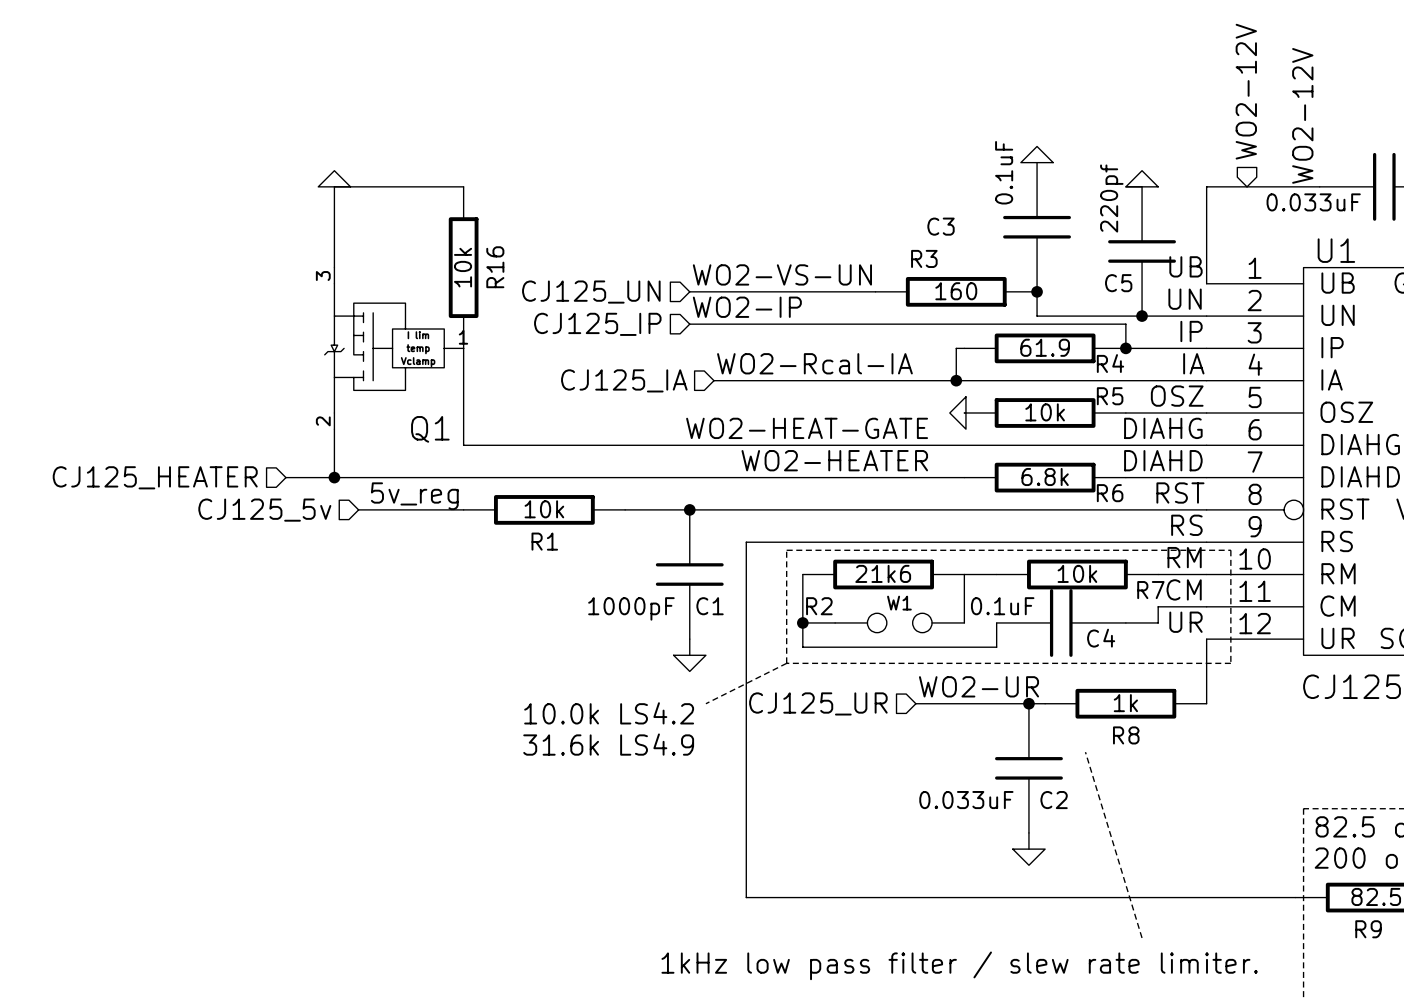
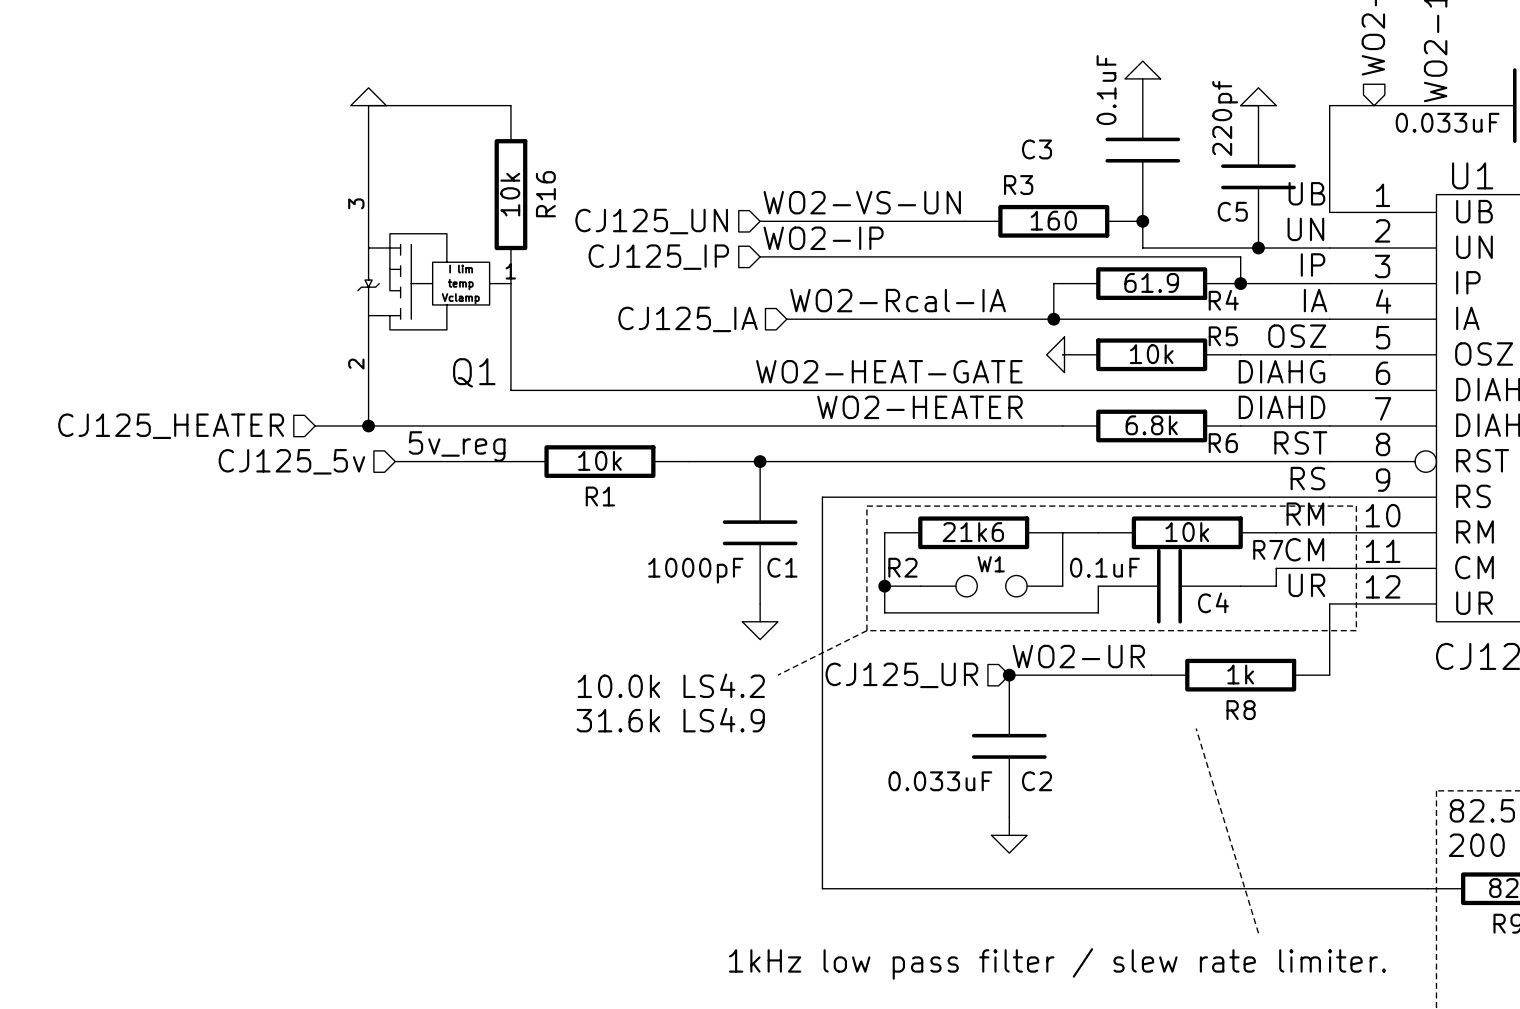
junction: none -> (1009, 675)
junction: (1028, 703) -> none
C2 position: (1028, 768) -> (1009, 746)
wire: (1028, 832) (1028, 849) -> (1009, 817) (1009, 835)
power symbol position: (1028, 857) -> (1009, 844)

